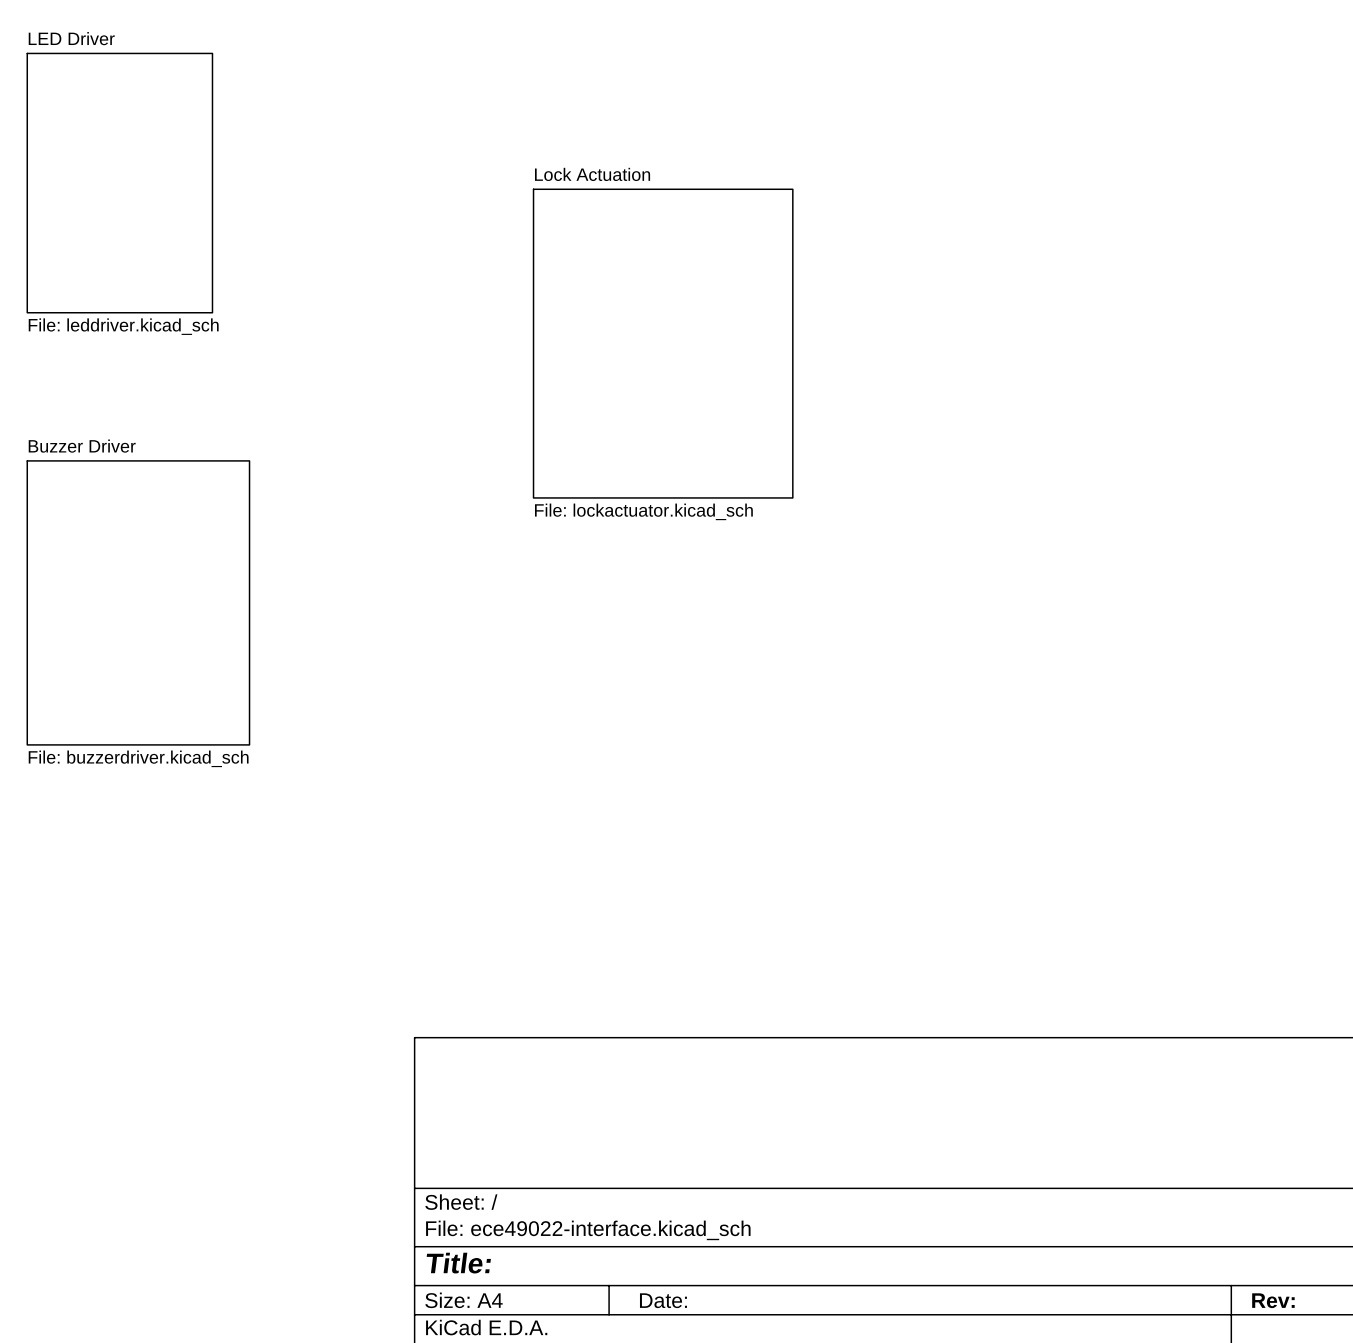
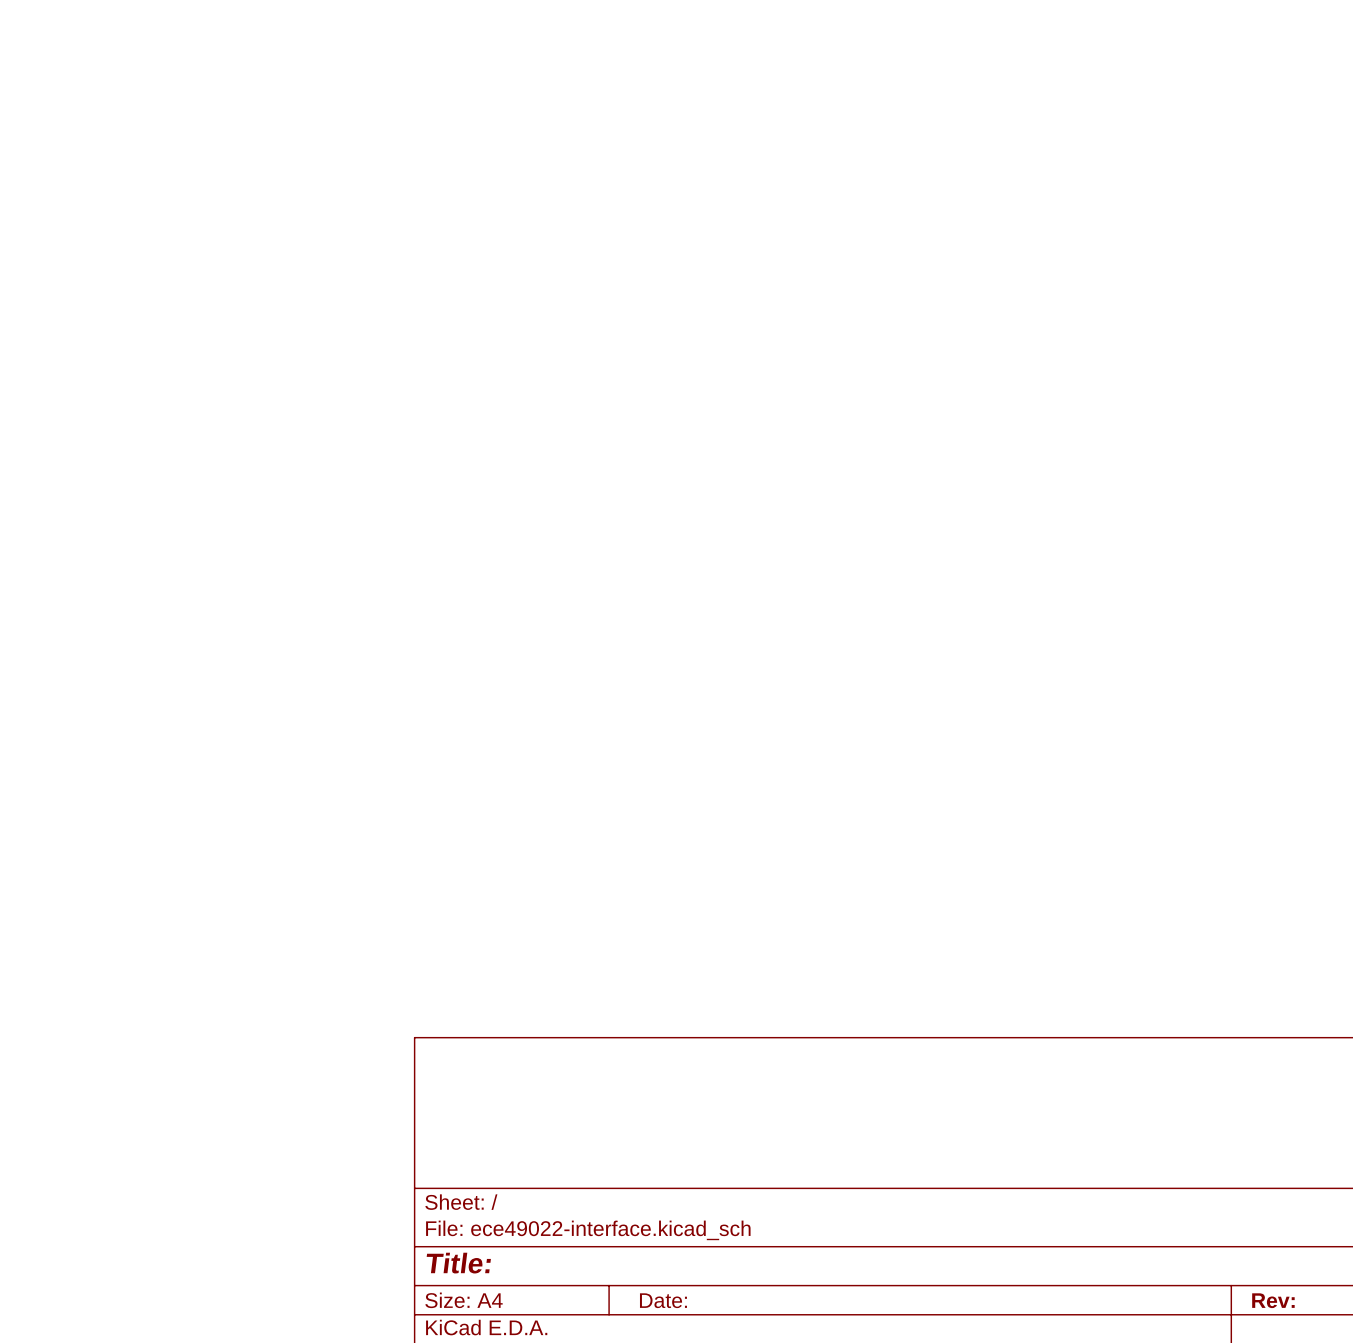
sheet LED Driver: File: leddriver.kicad_sch (119, 183) -> none
sheet Lock Actuation: File: lockactuator.kicad_sch (663, 343) -> none
sheet Buzzer Driver: File: buzzerdriver.kicad_sch (138, 602) -> none

